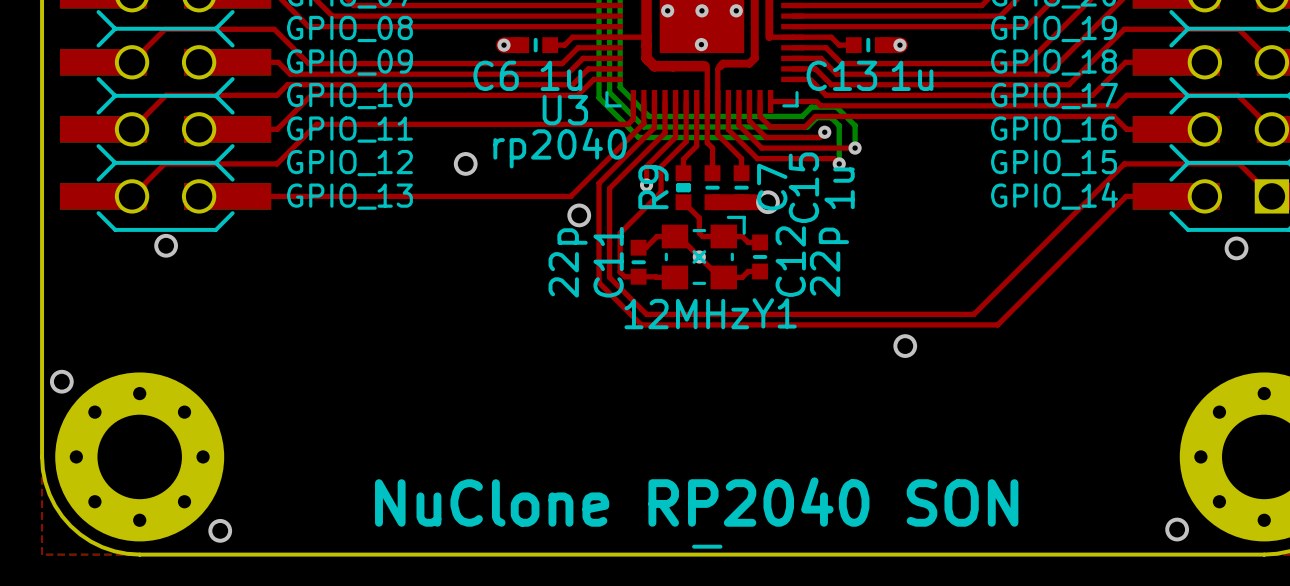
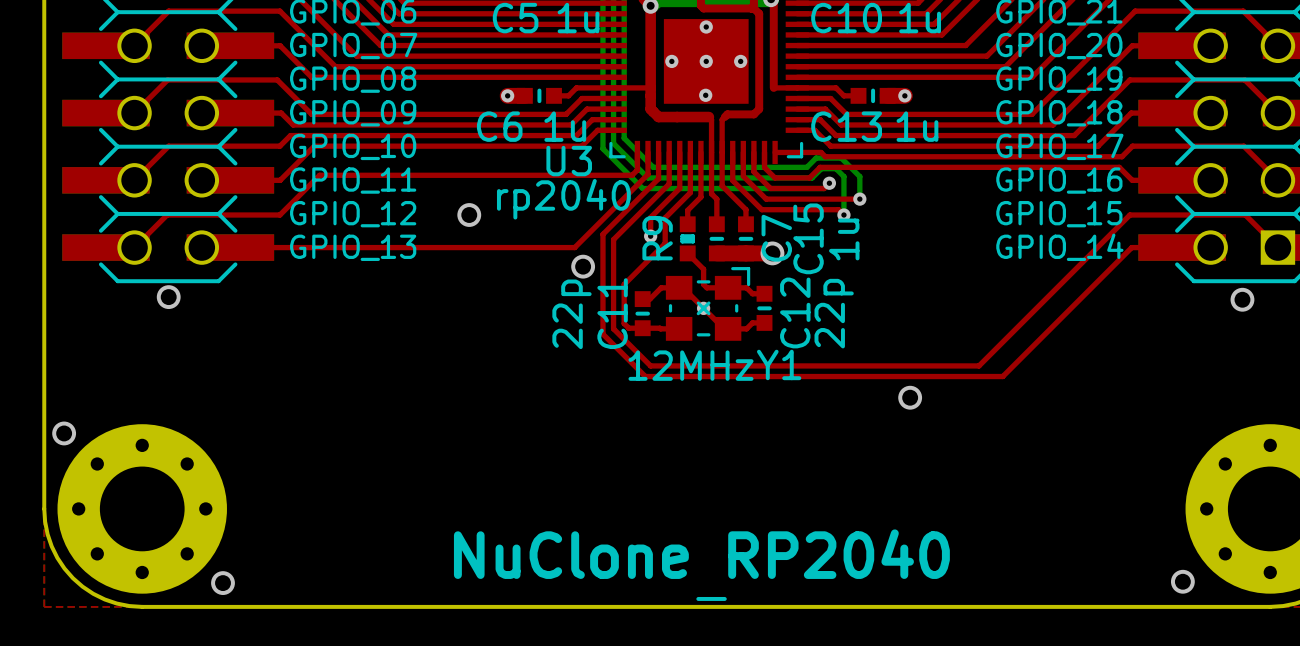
drawing shape: [375, 477, 1019, 549] -> [453, 529, 950, 601]

